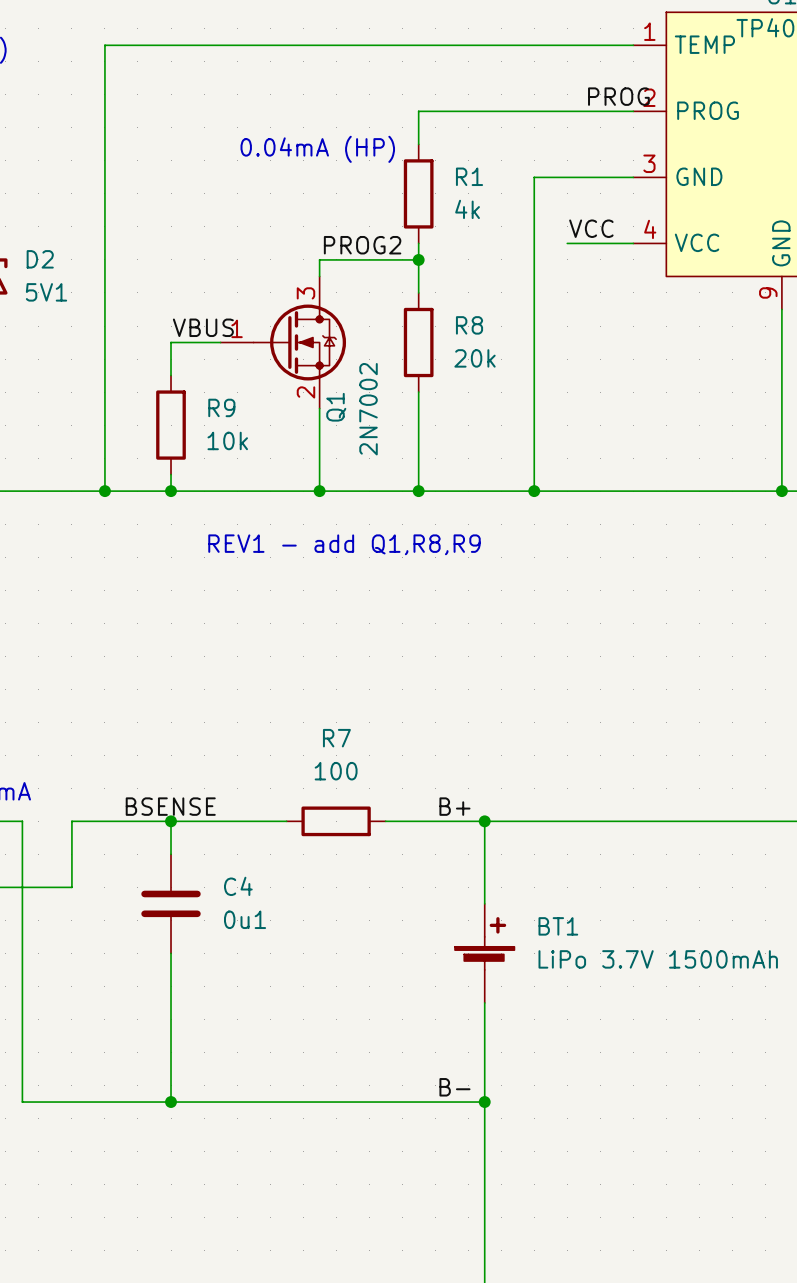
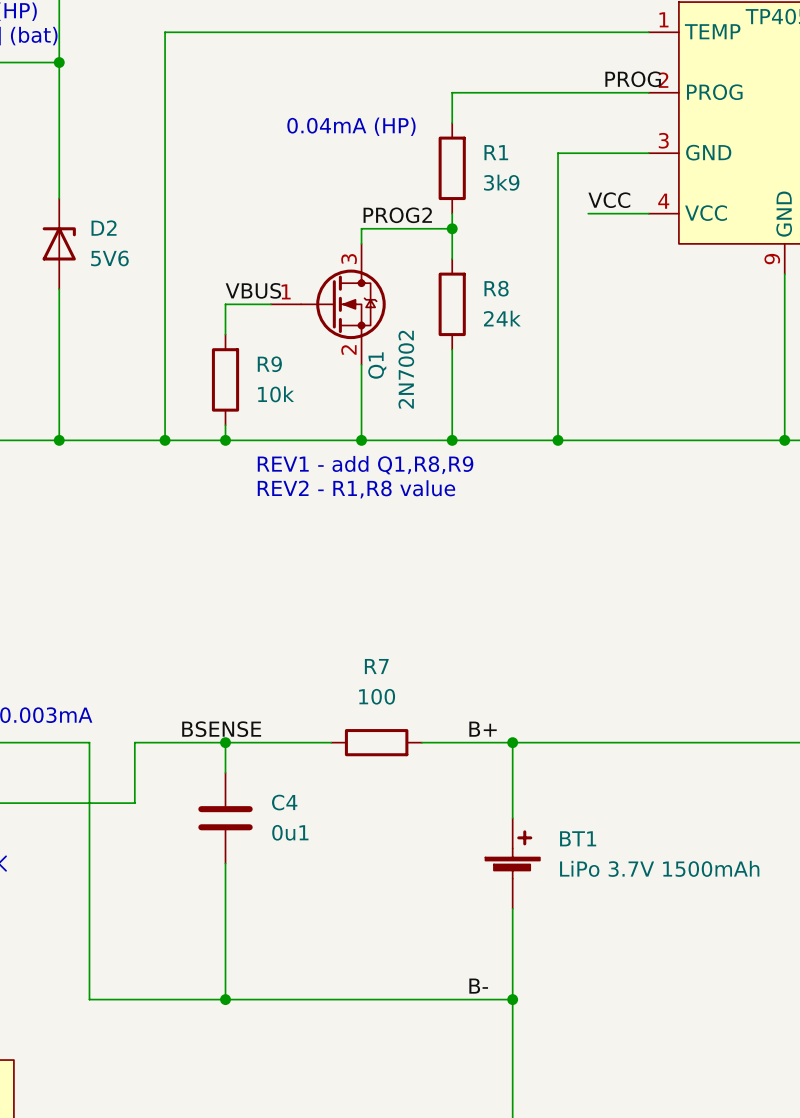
R1 value: 4k (467, 209) -> 3k9 (501, 182)
D2 value: 5V1 (46, 292) -> 5V6 (109, 258)
R8 value: 20k (475, 358) -> 24k (502, 318)
text: none -> REV1 - add Q1,R8,R9 (365, 465)
text: REV1 - add Q1,R8,R9 (344, 544) -> REV2 - R1,R8 value (356, 489)

